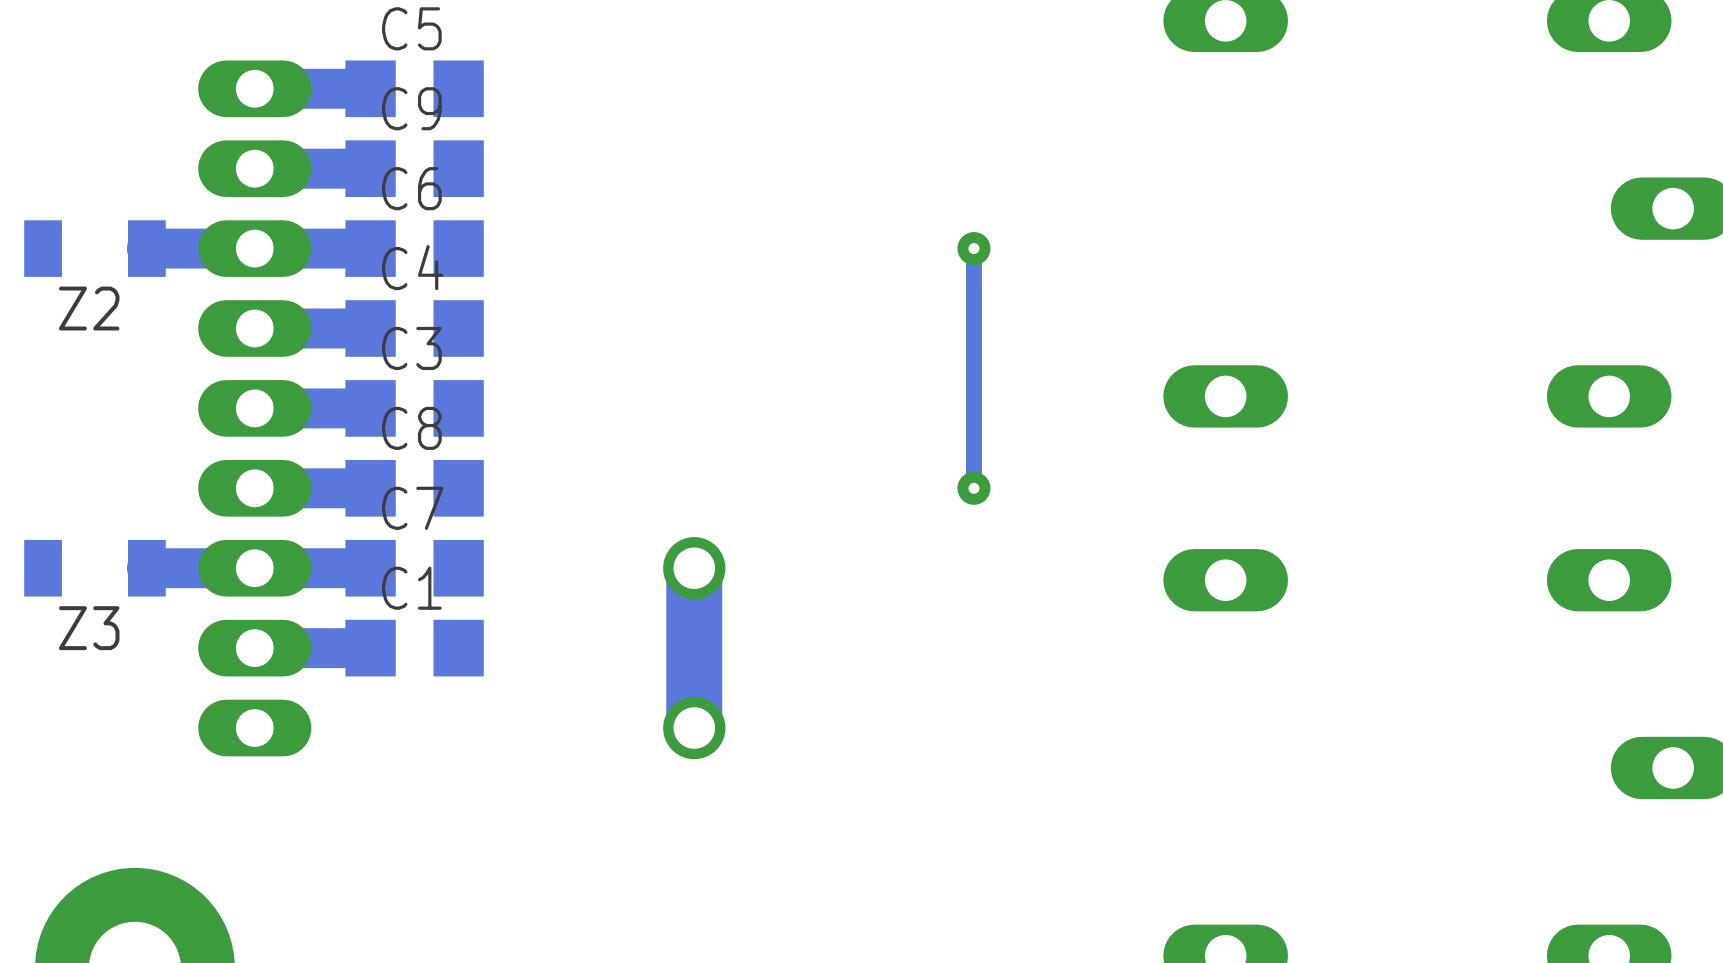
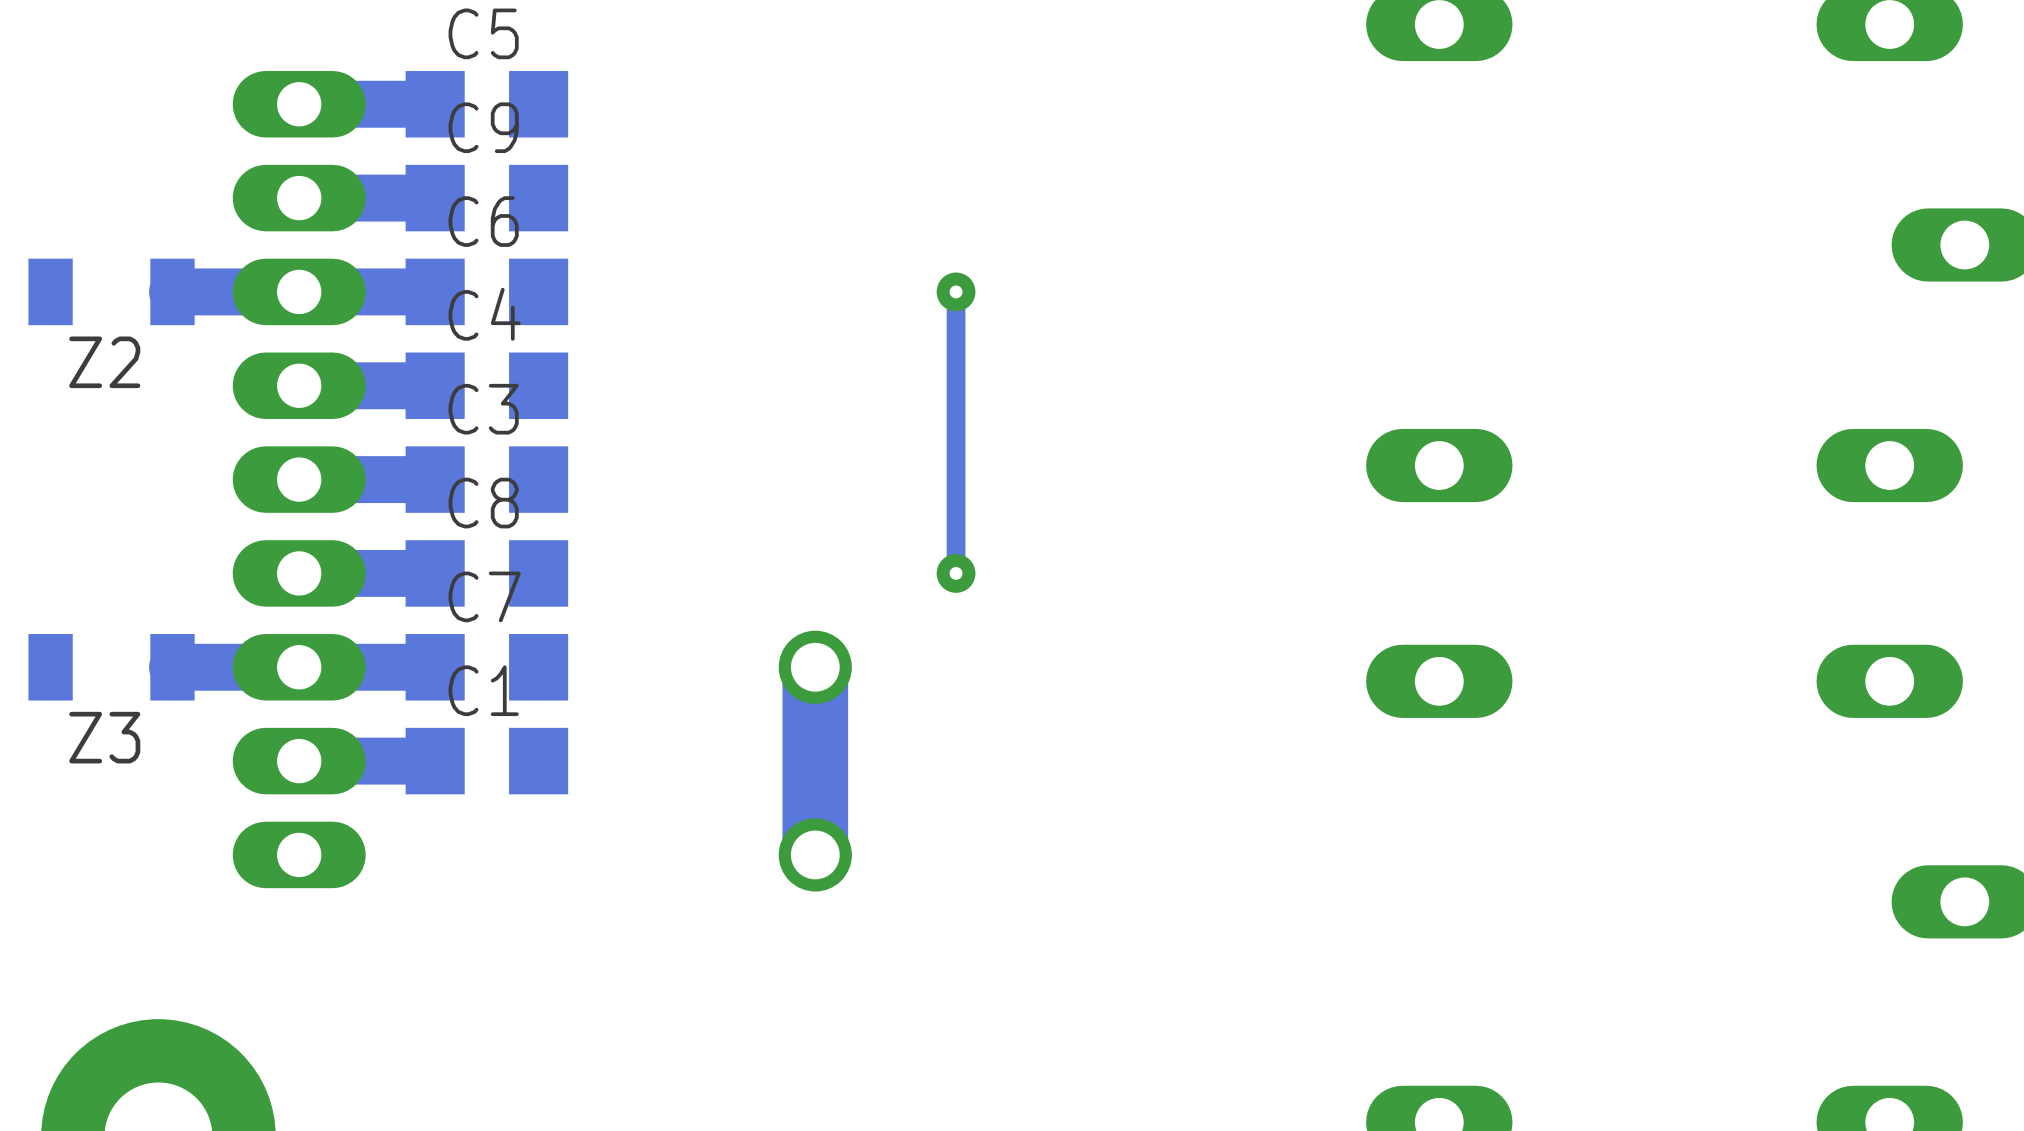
via: none -> (956, 291)
track: (973, 248) (973, 488) -> (956, 291) (956, 573)
via: (973, 248) -> none
via: none -> (956, 573)
via: (973, 488) -> none

